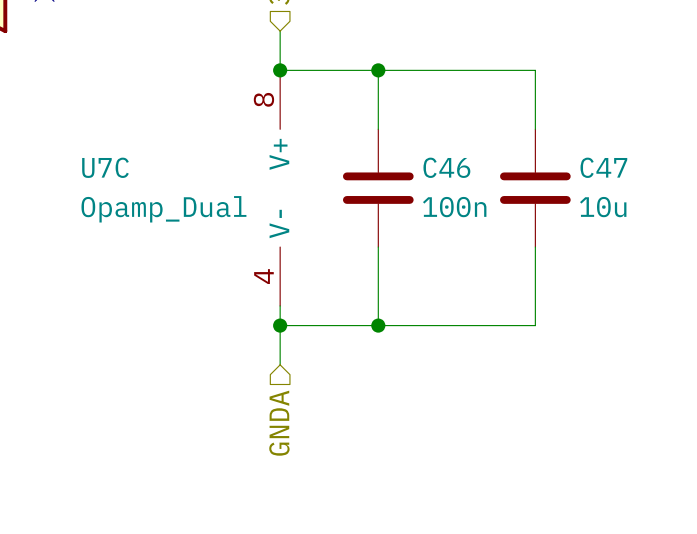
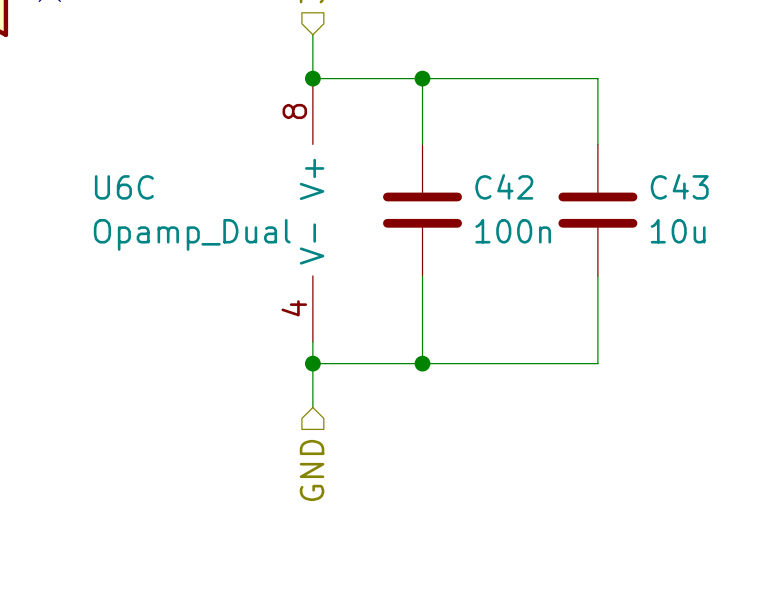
U7C name: U7C (105, 167) -> U6C (124, 187)
C46 name: C46 (446, 167) -> C42 (504, 186)
C47 name: C47 (603, 167) -> C43 (679, 186)
hierarchical label: GNDA (279, 423) -> GND (312, 470)

